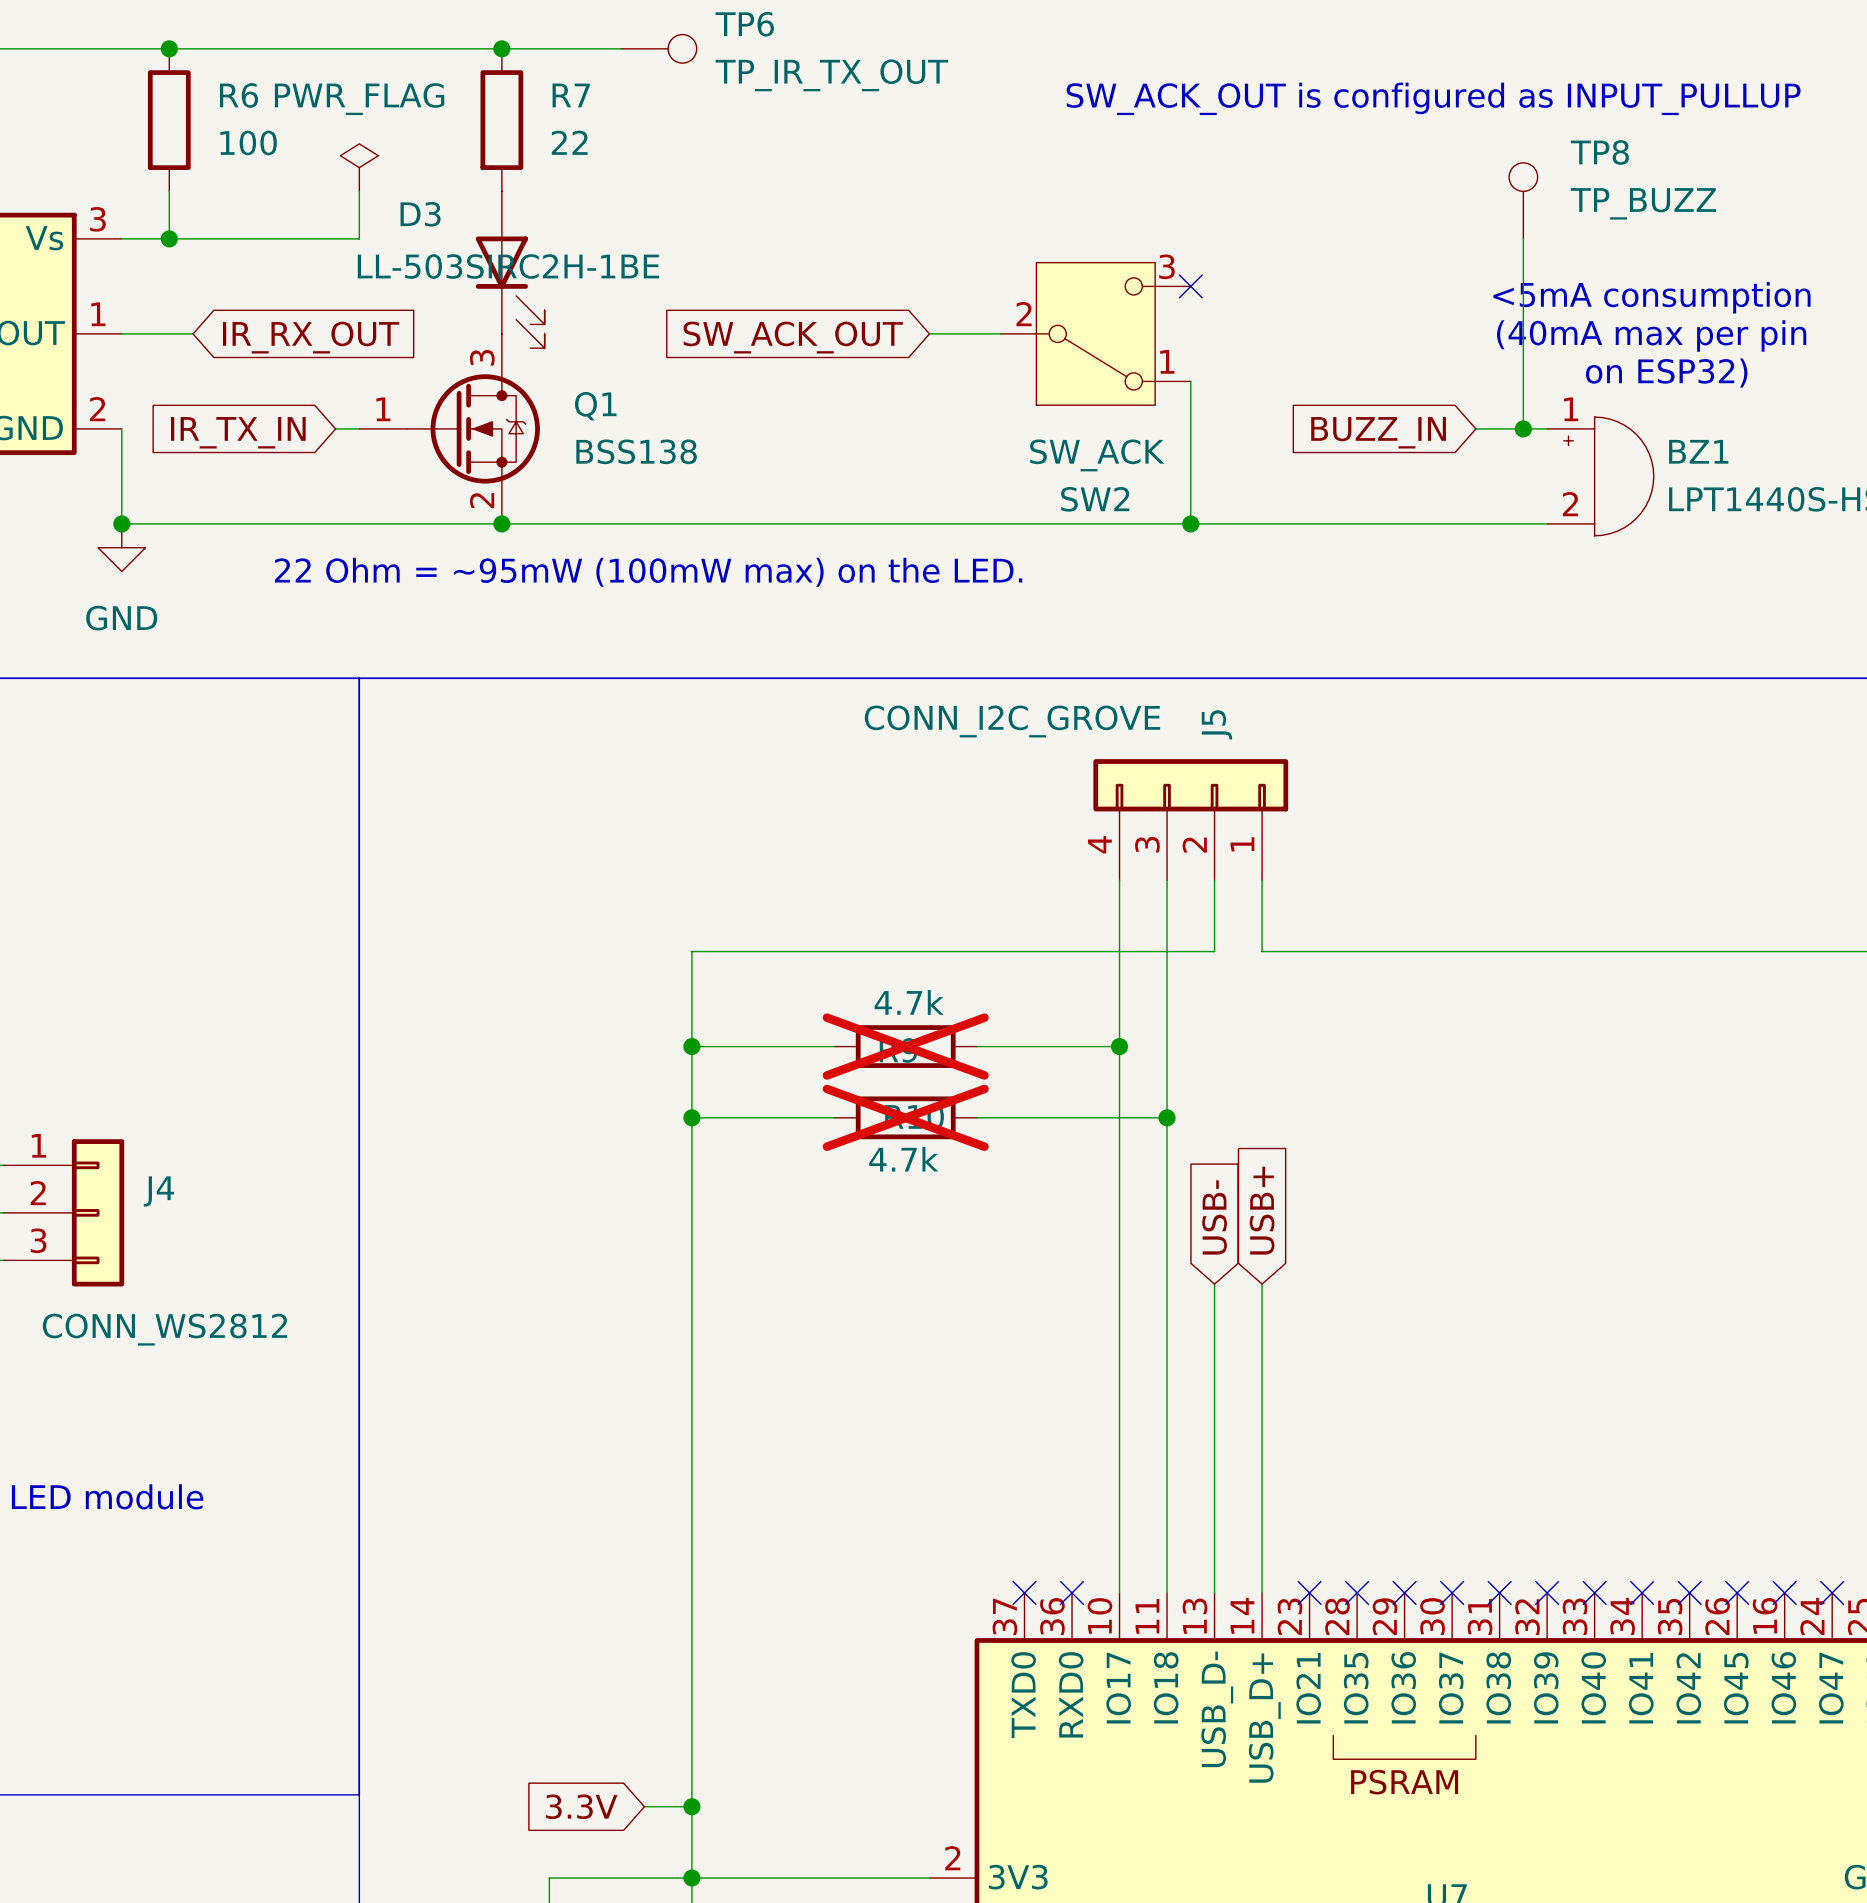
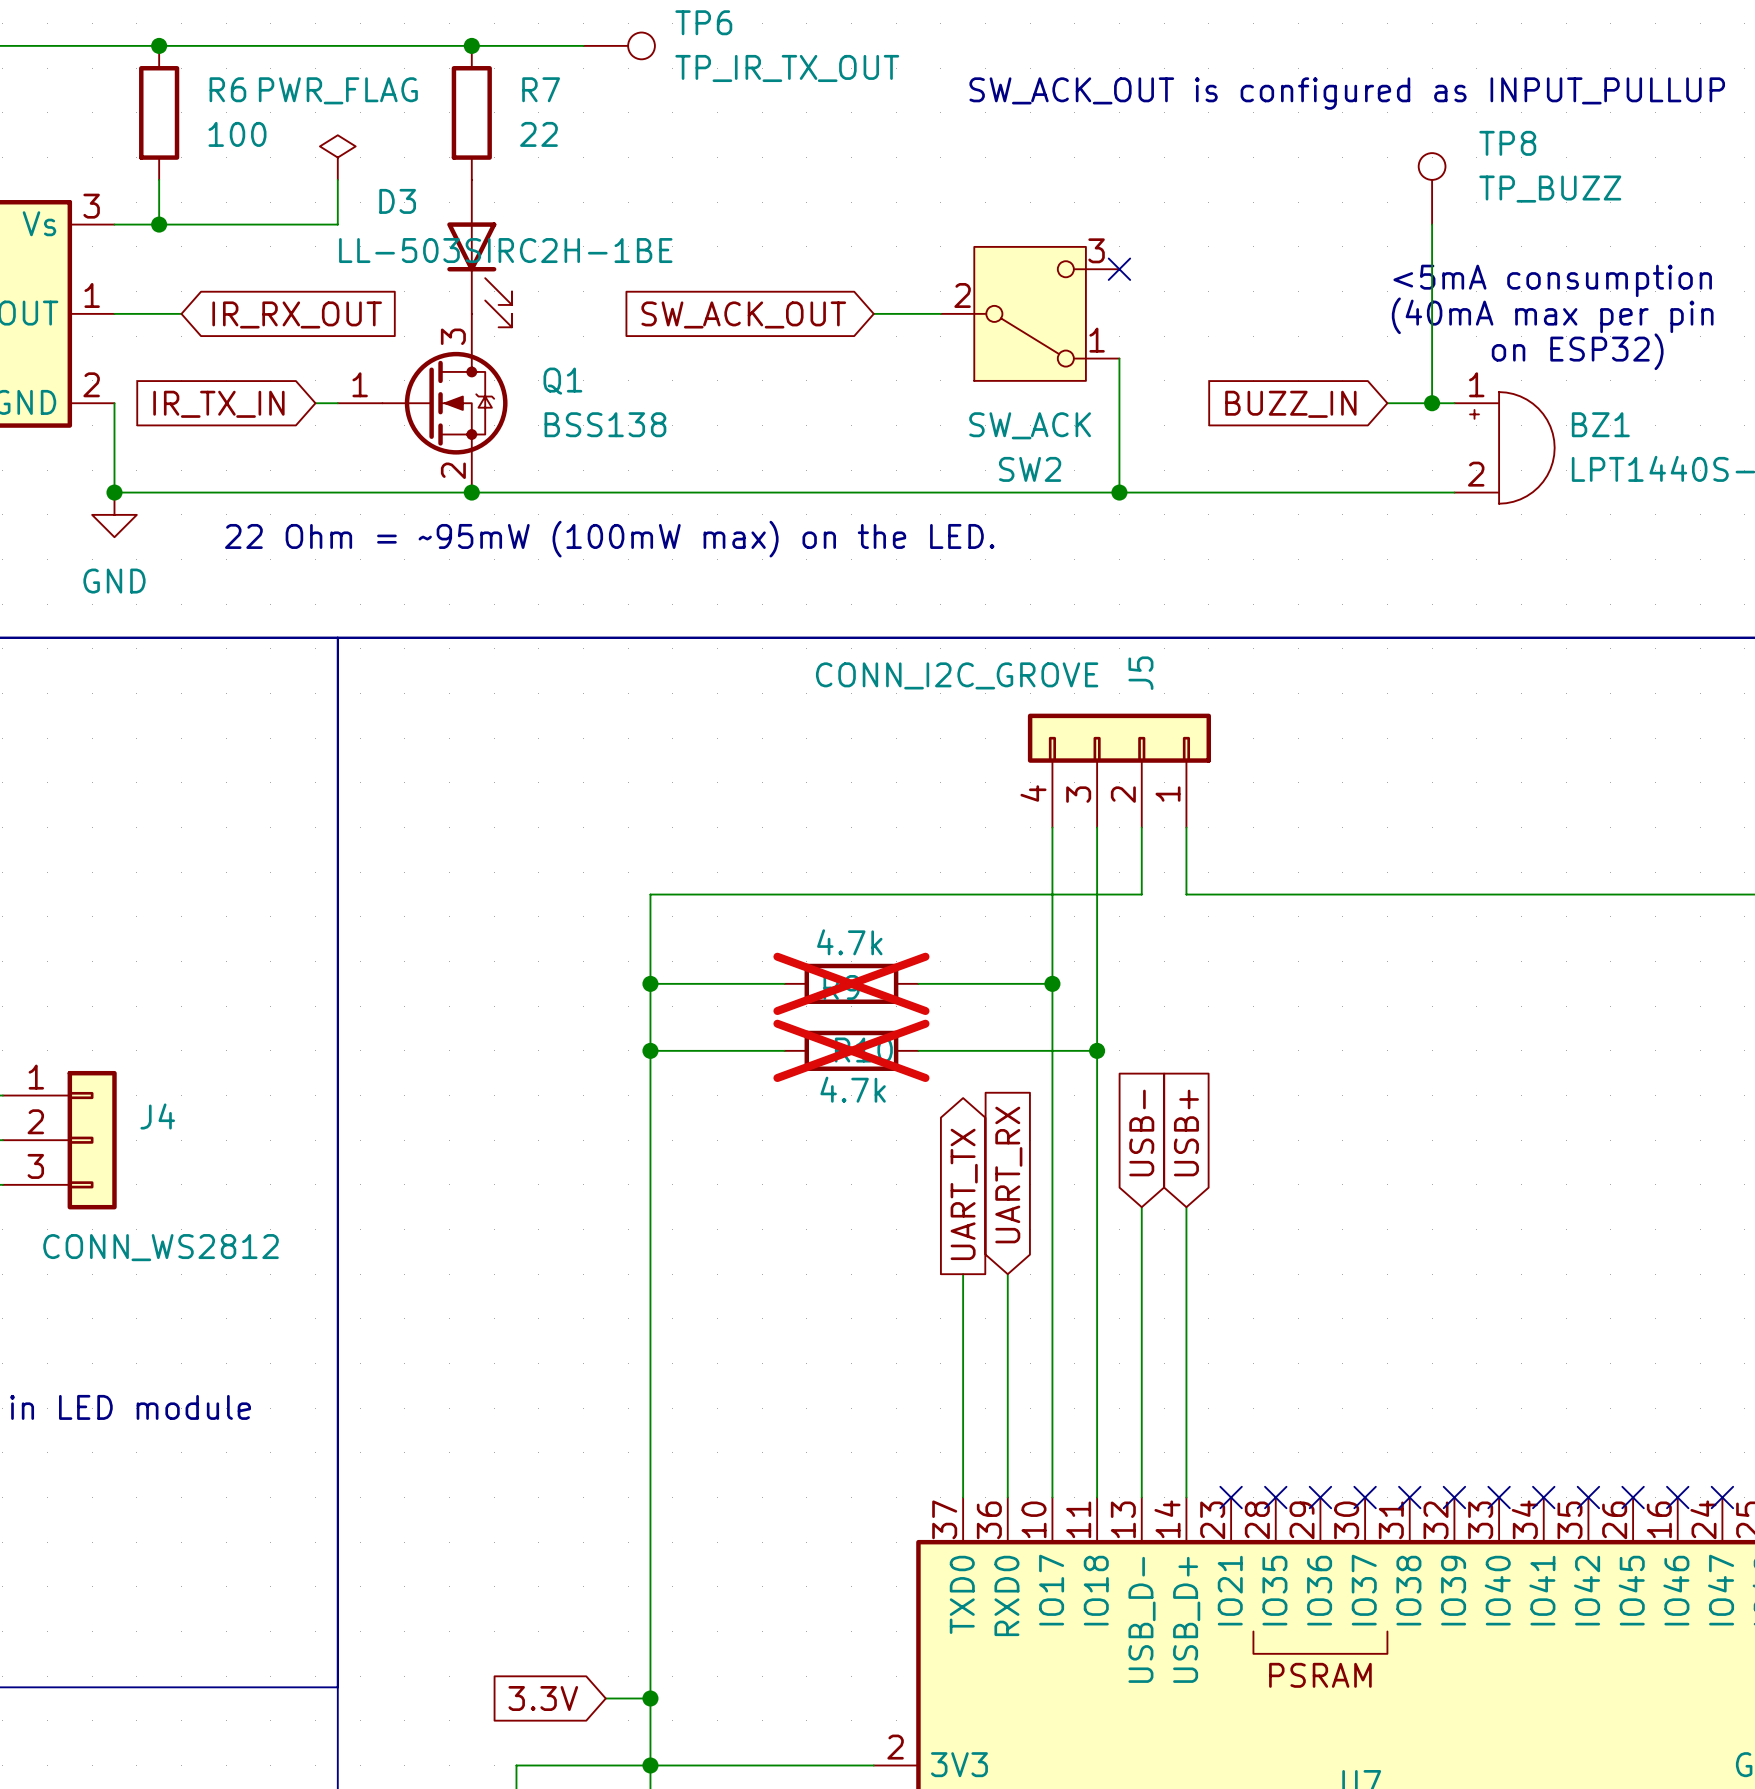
global label: none -> UART_RX (1008, 1174)
global label: none -> UART_TX (964, 1194)
wire: none -> (963, 1274) (963, 1497)
wire: none -> (1007, 1274) (1007, 1497)
no-connect mark: (1024, 1592) -> none
no-connect mark: (1072, 1592) -> none

